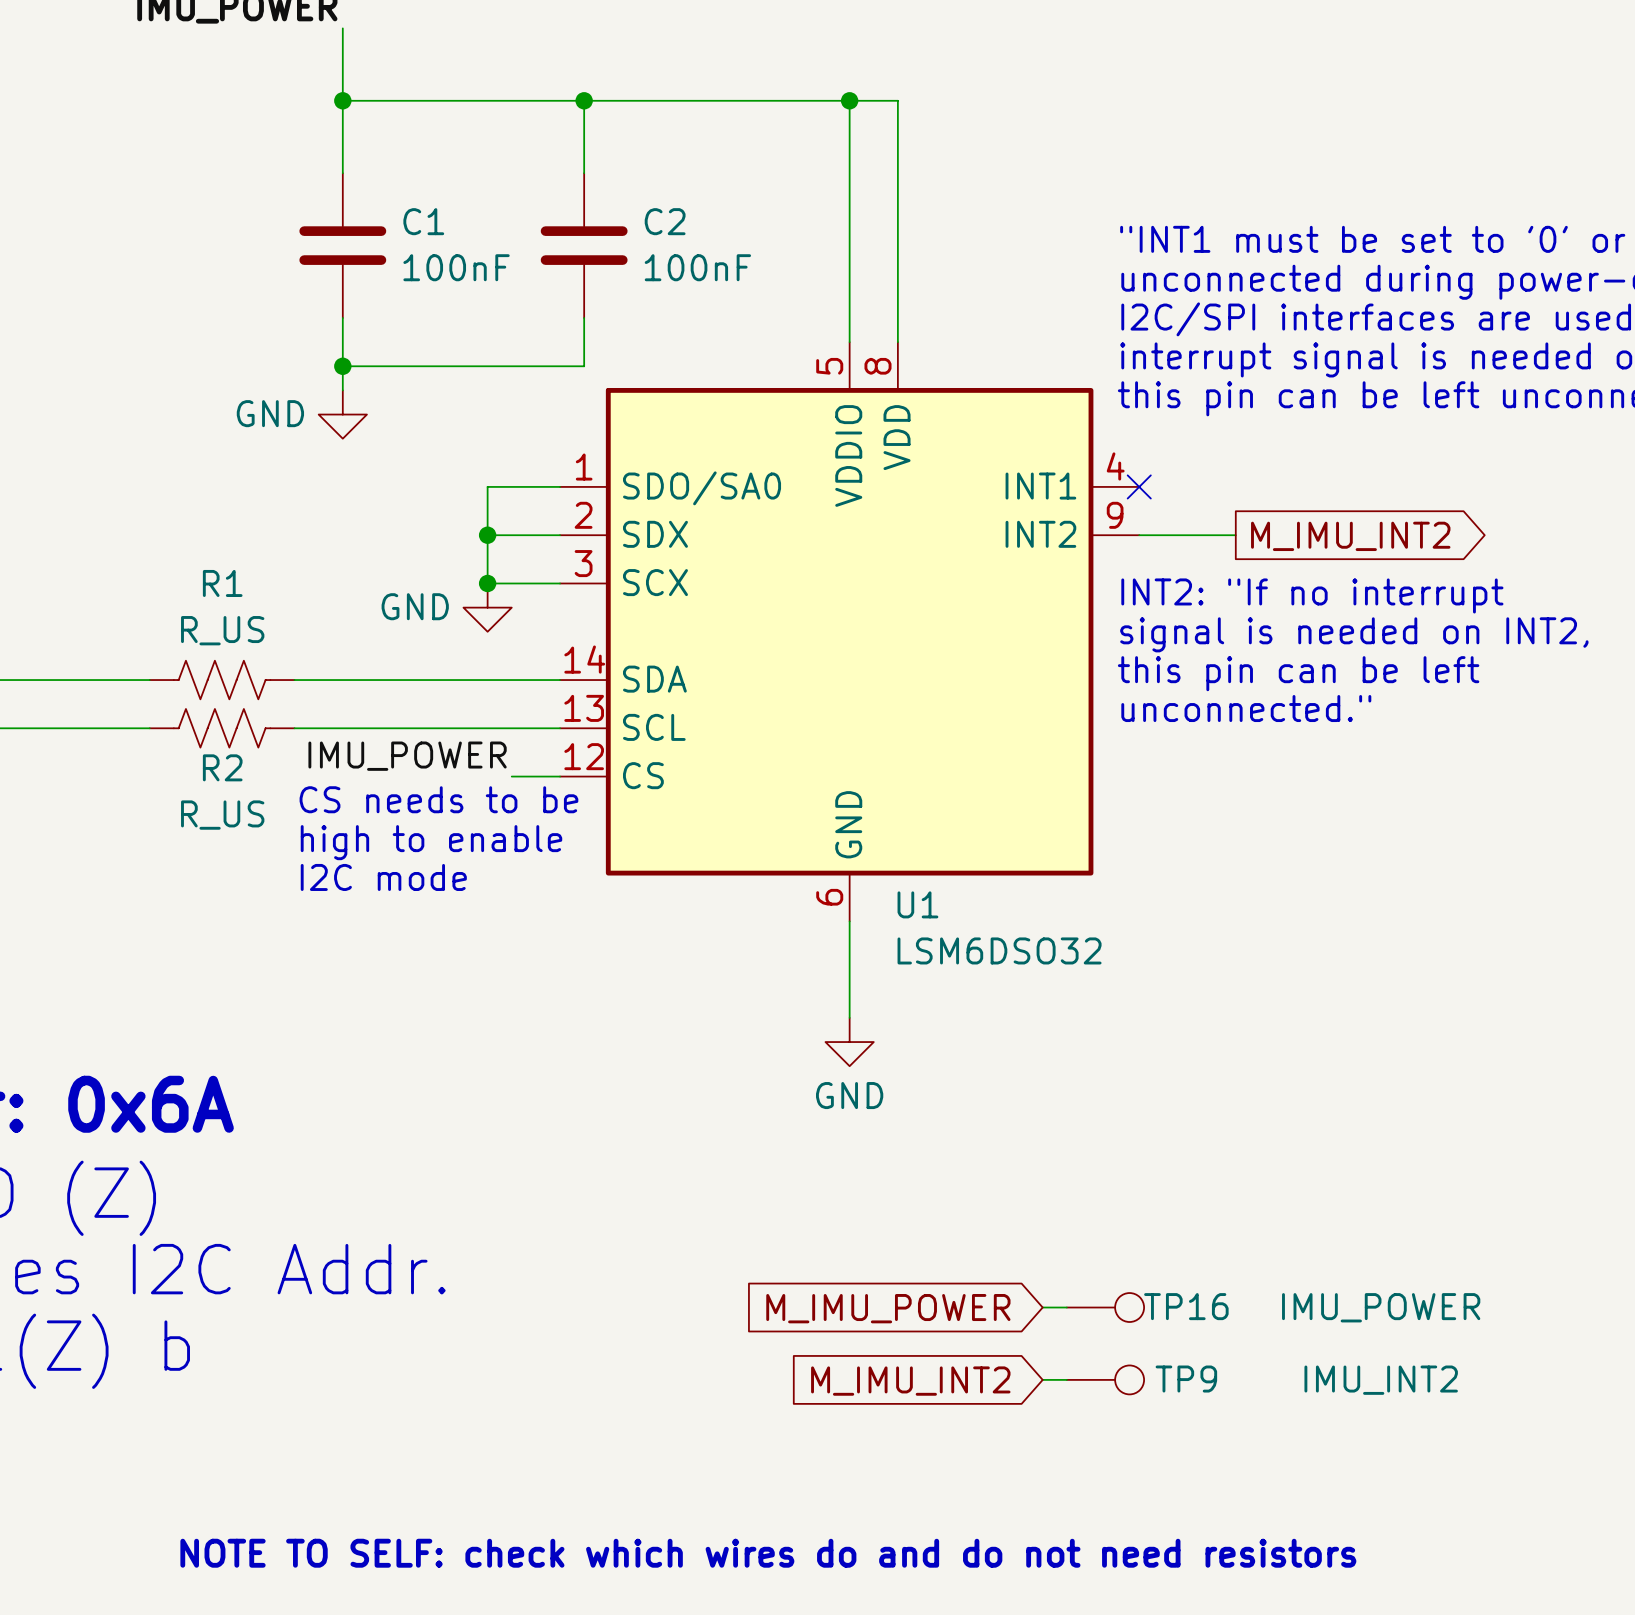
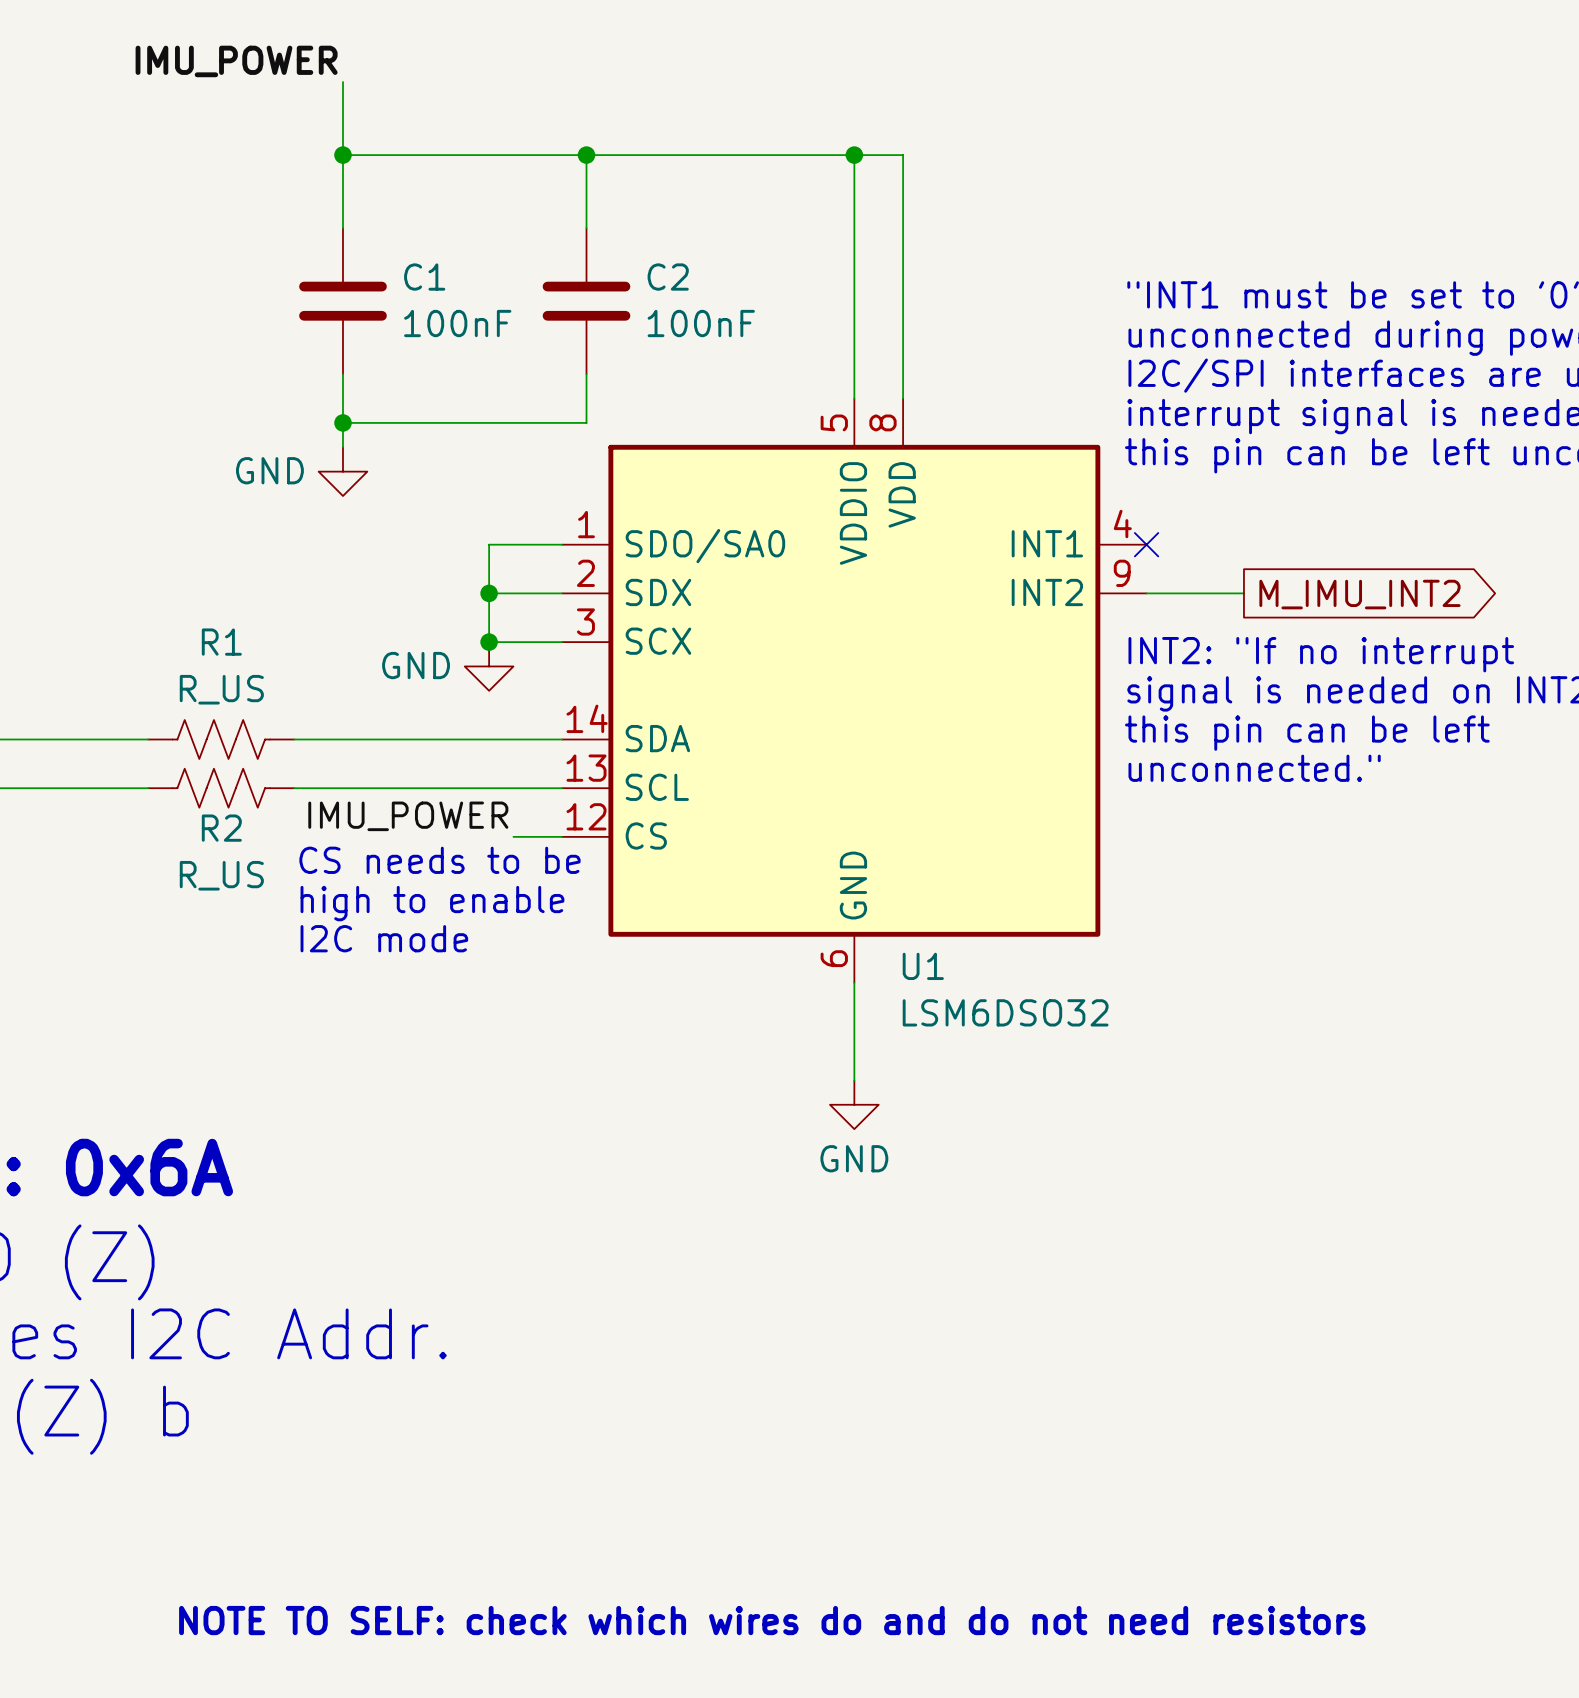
wire: (1042, 1307) (1066, 1307) -> none
TP16: IMU_POWER (1105, 1307) -> none
global label: M_IMU_POWER (888, 1308) -> none
wire: (1042, 1379) (1066, 1379) -> none
TP9: IMU_INT2 (1105, 1379) -> none
global label: M_IMU_INT2 (910, 1381) -> none

